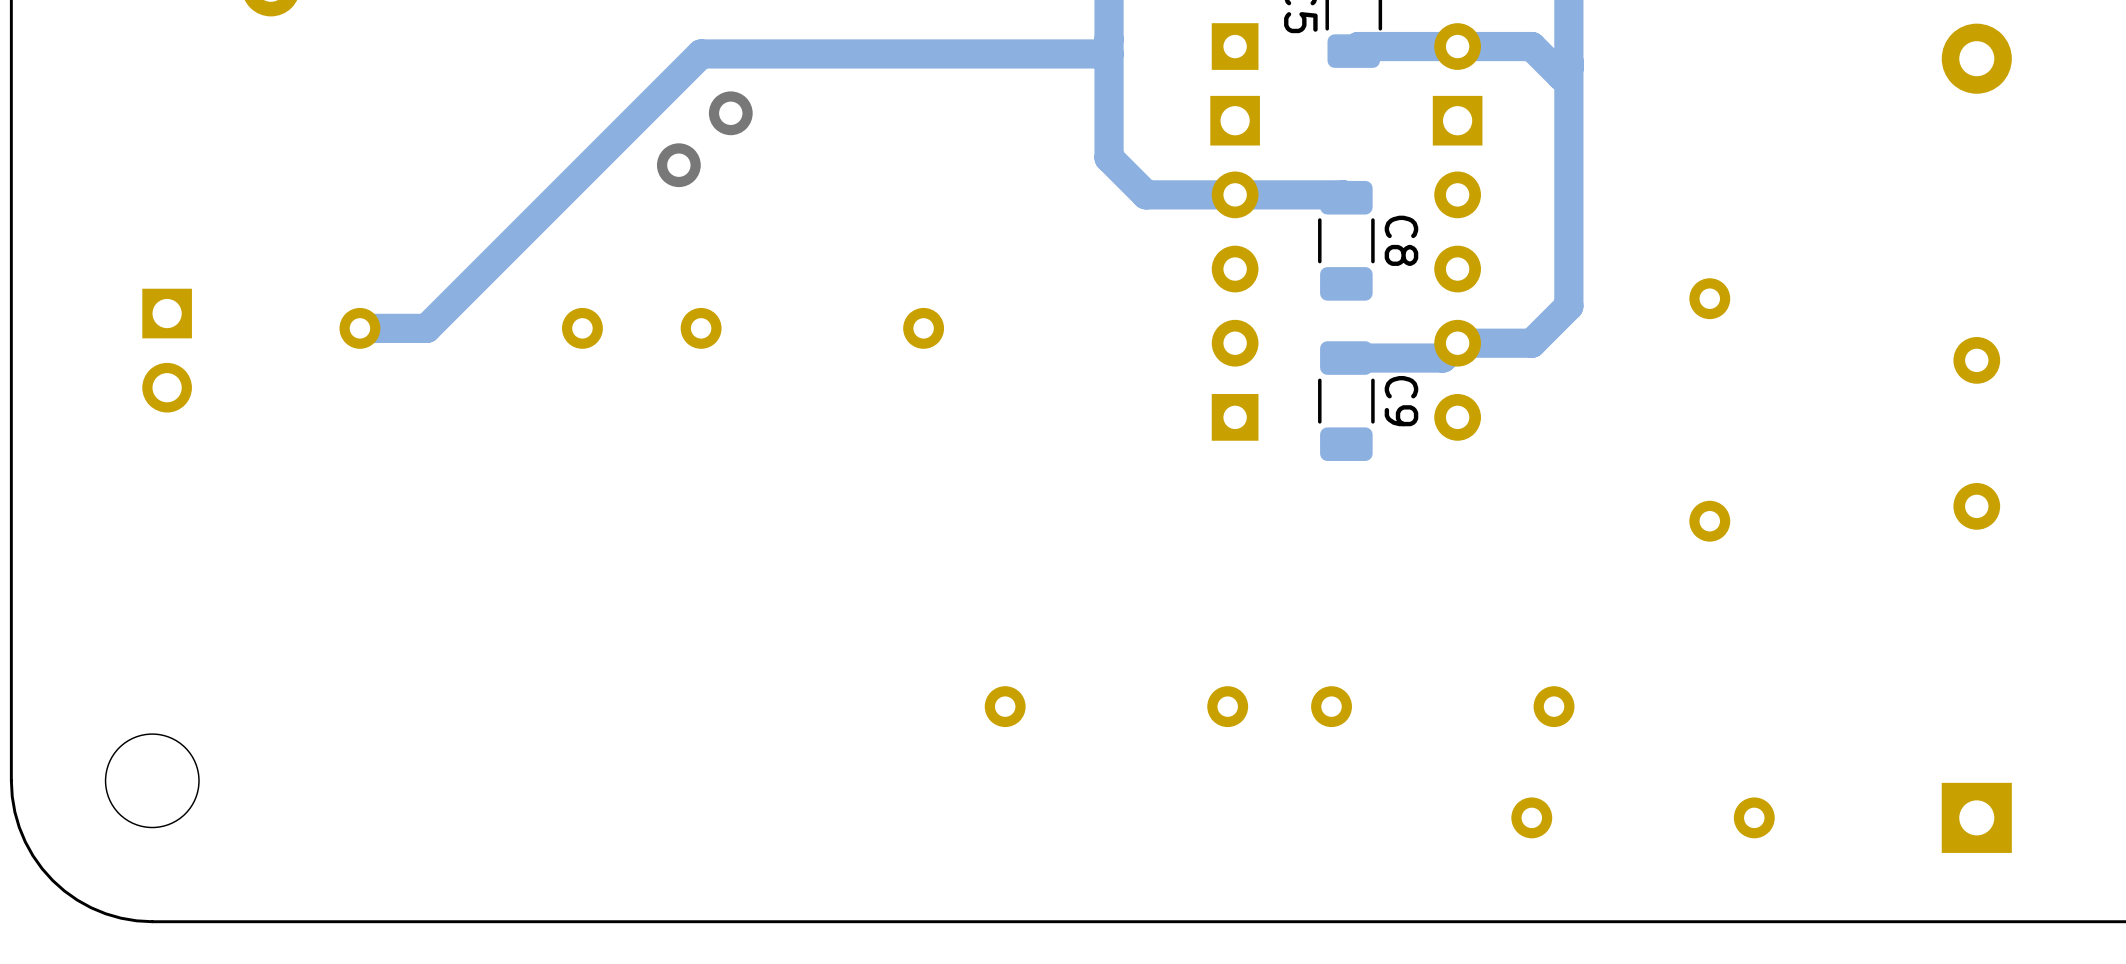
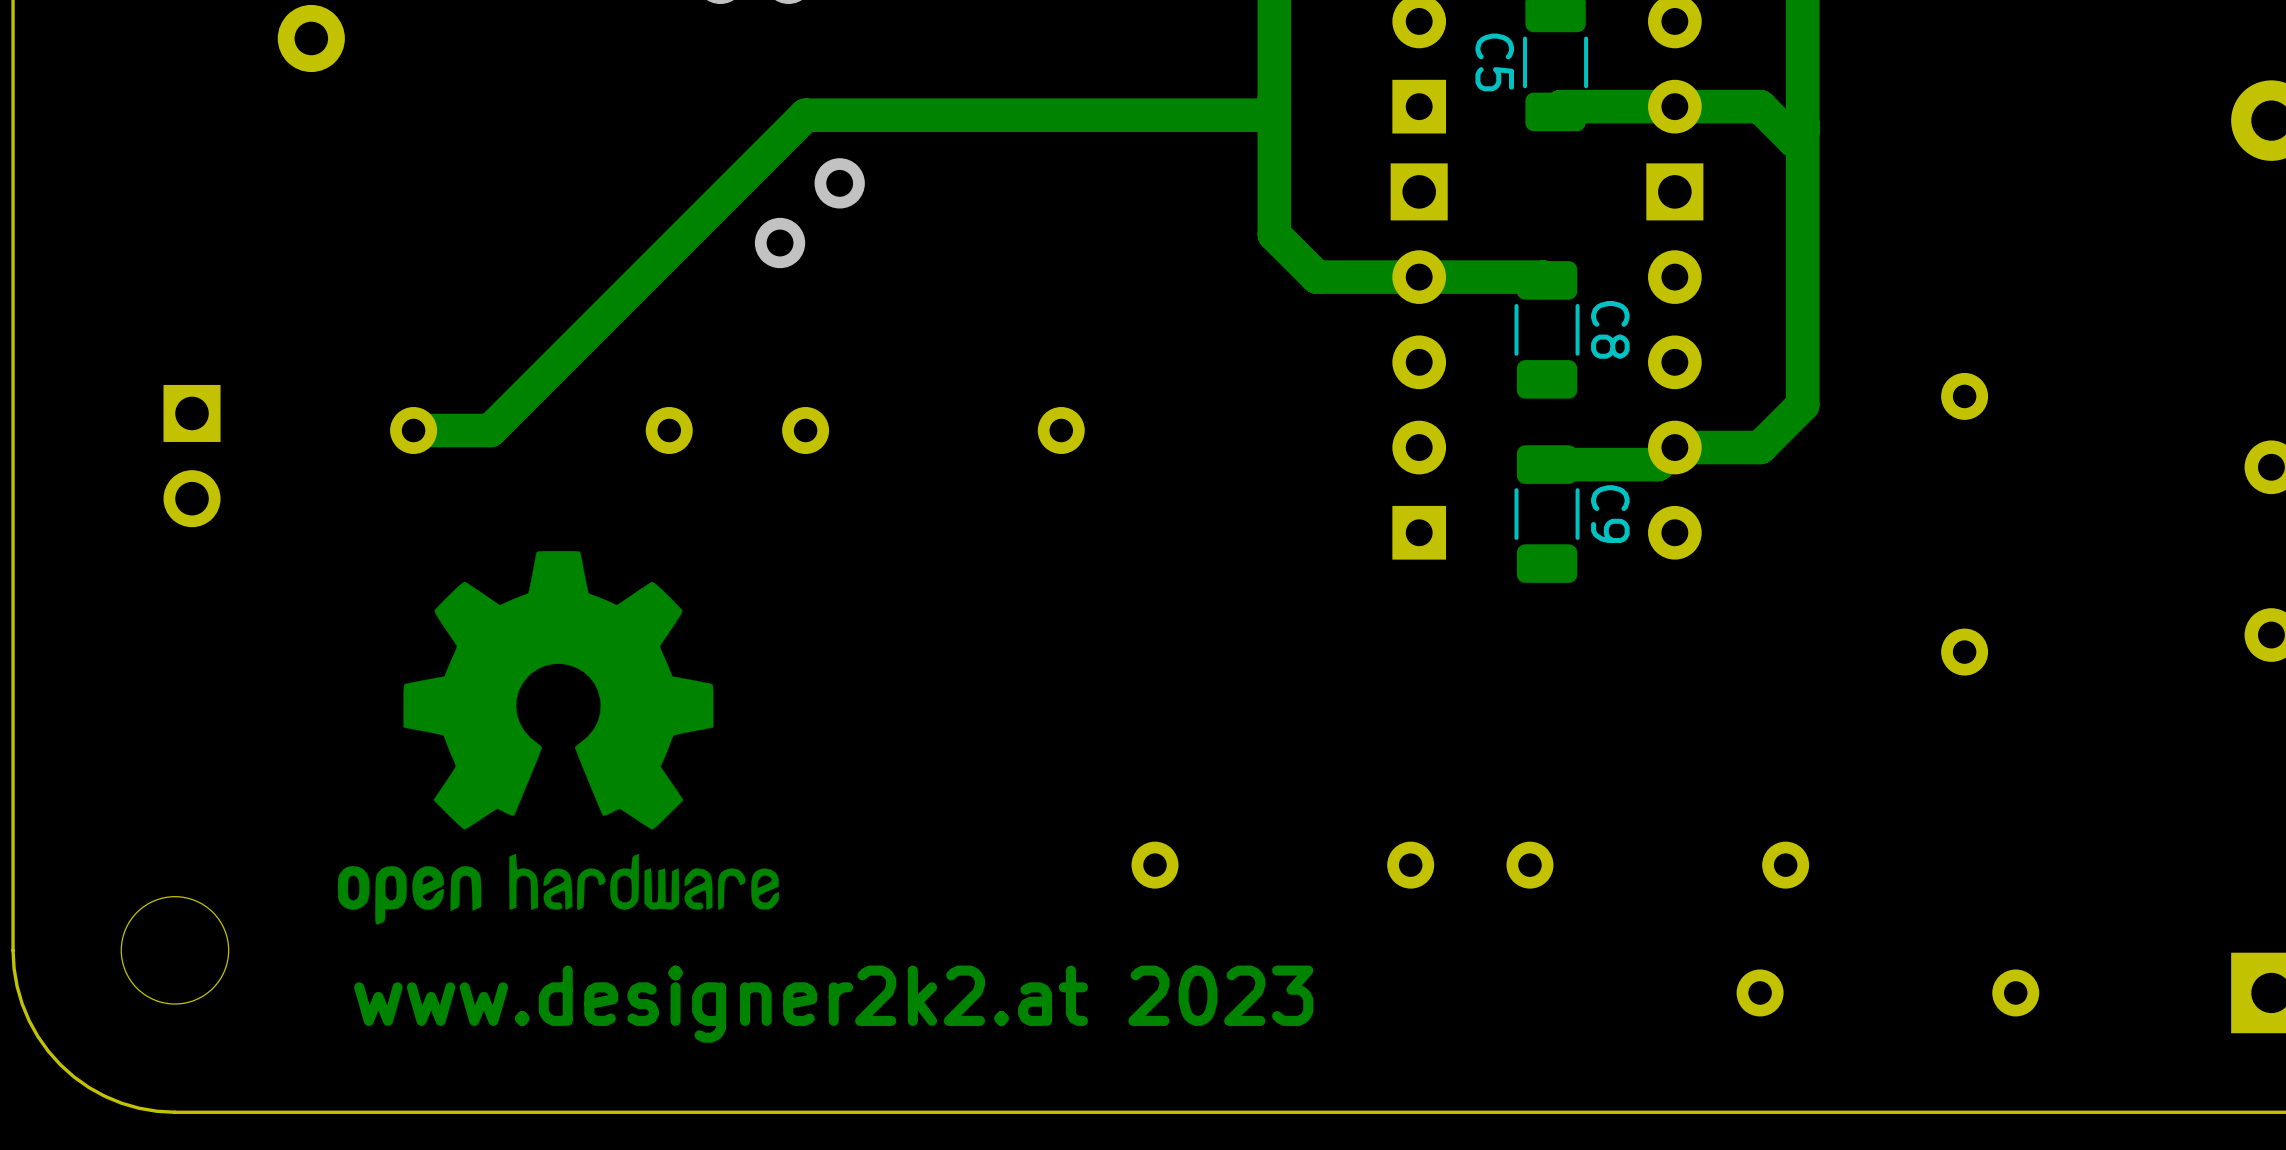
drawing: none -> [337, 551, 780, 925]
text: none -> www.designer2k2.at 2023 (833, 1004)

